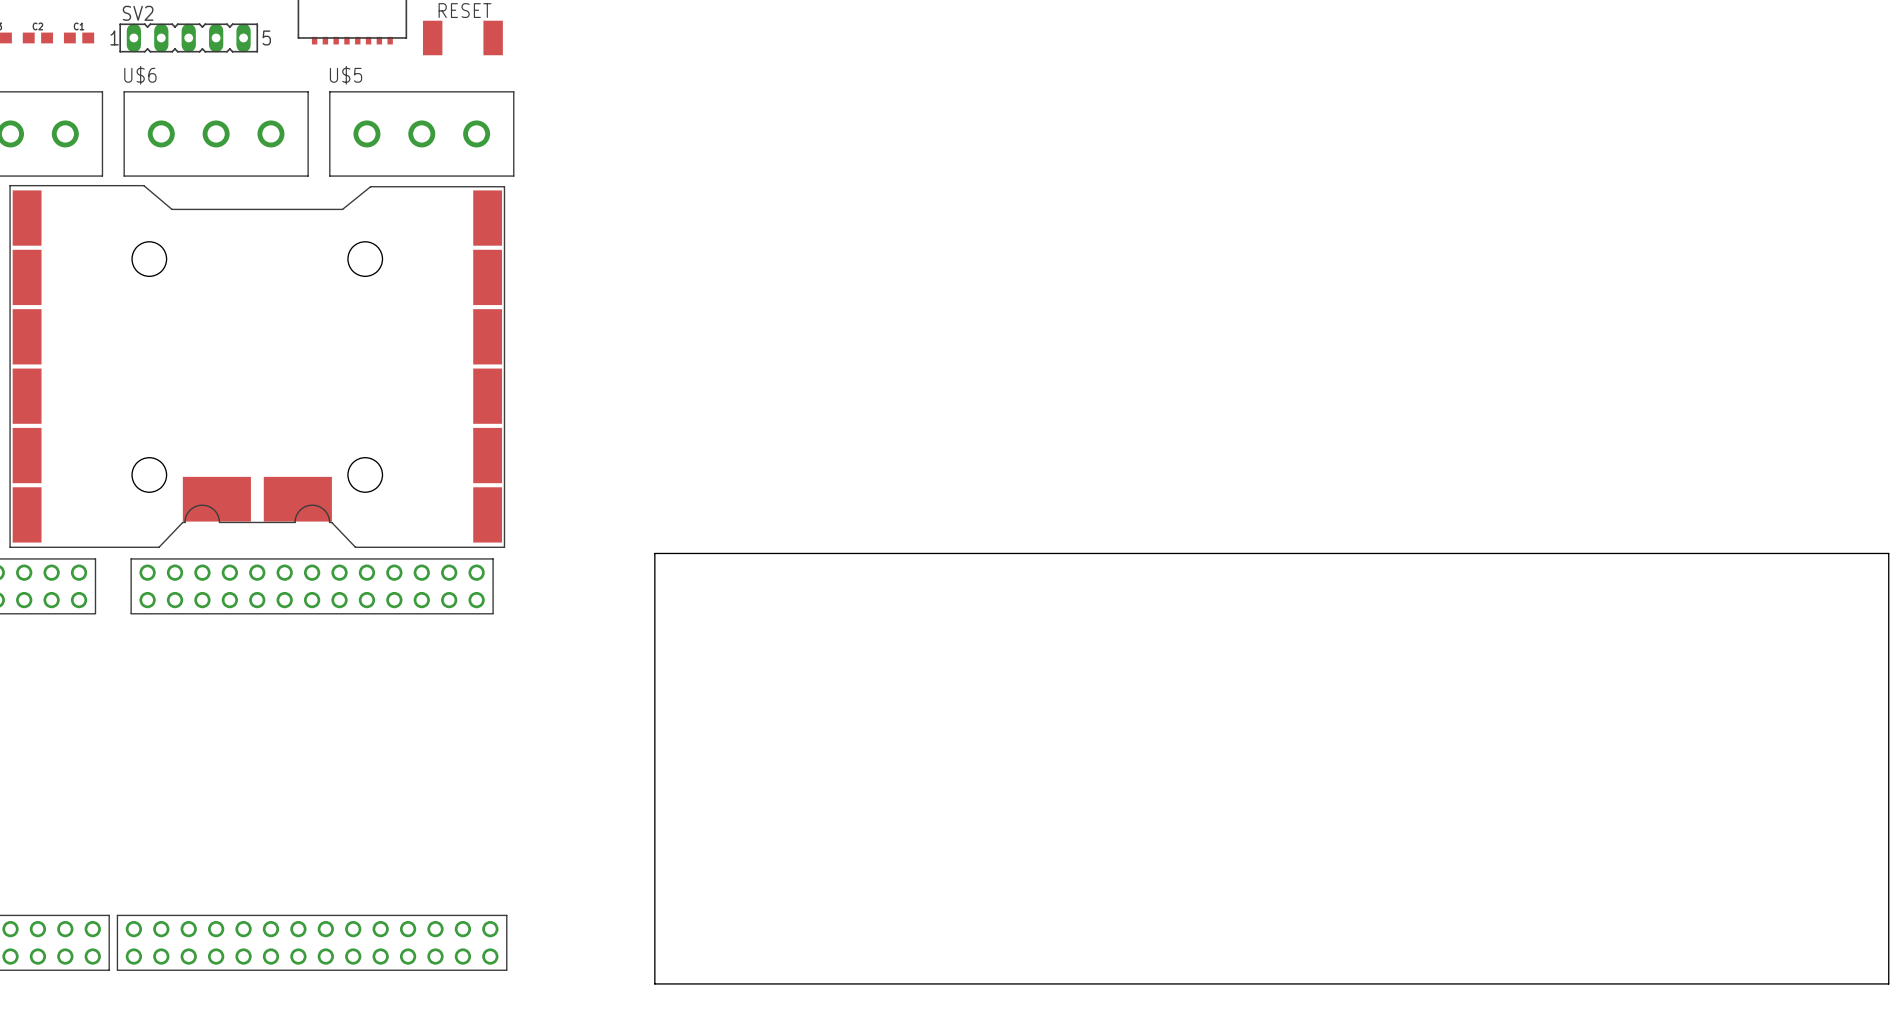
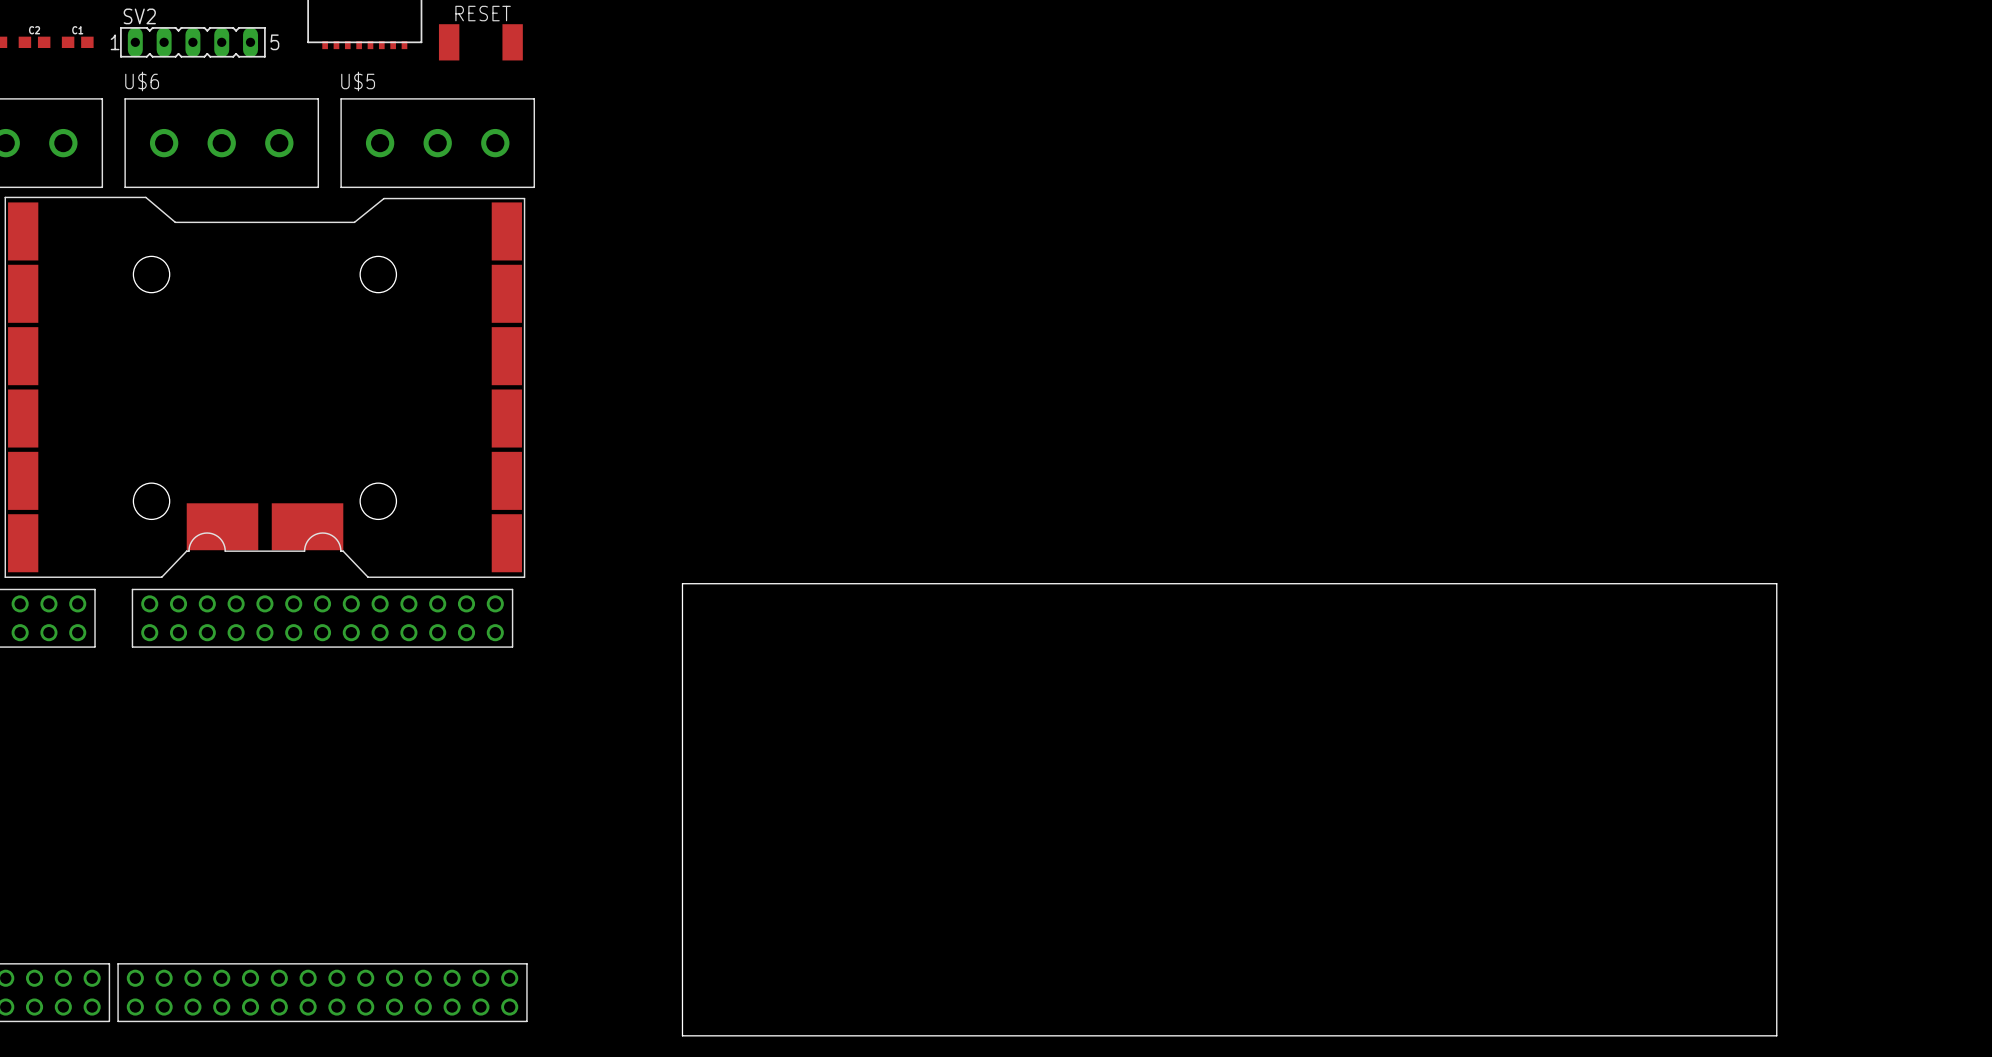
board edge: (1696, 553) (1888, 553) (1888, 983) (1696, 983) -> (1776, 583) (1776, 1035)

